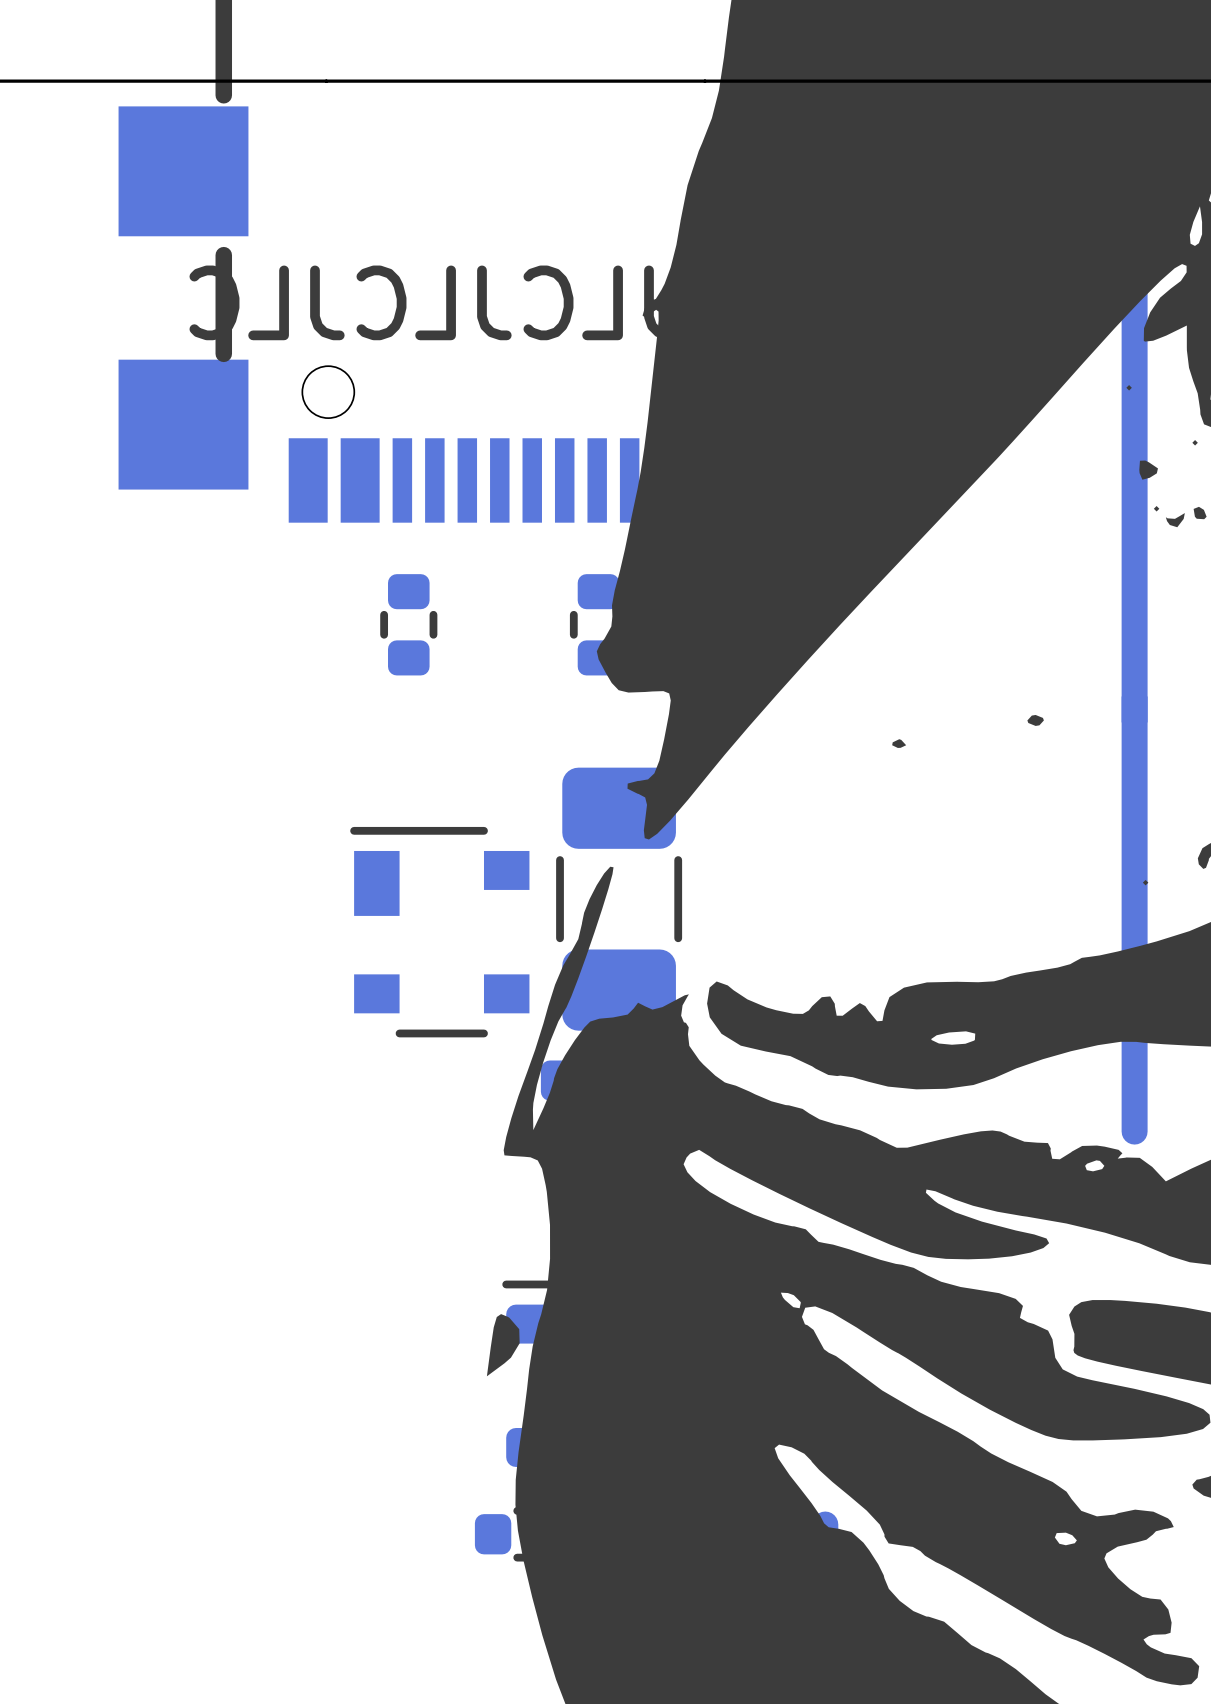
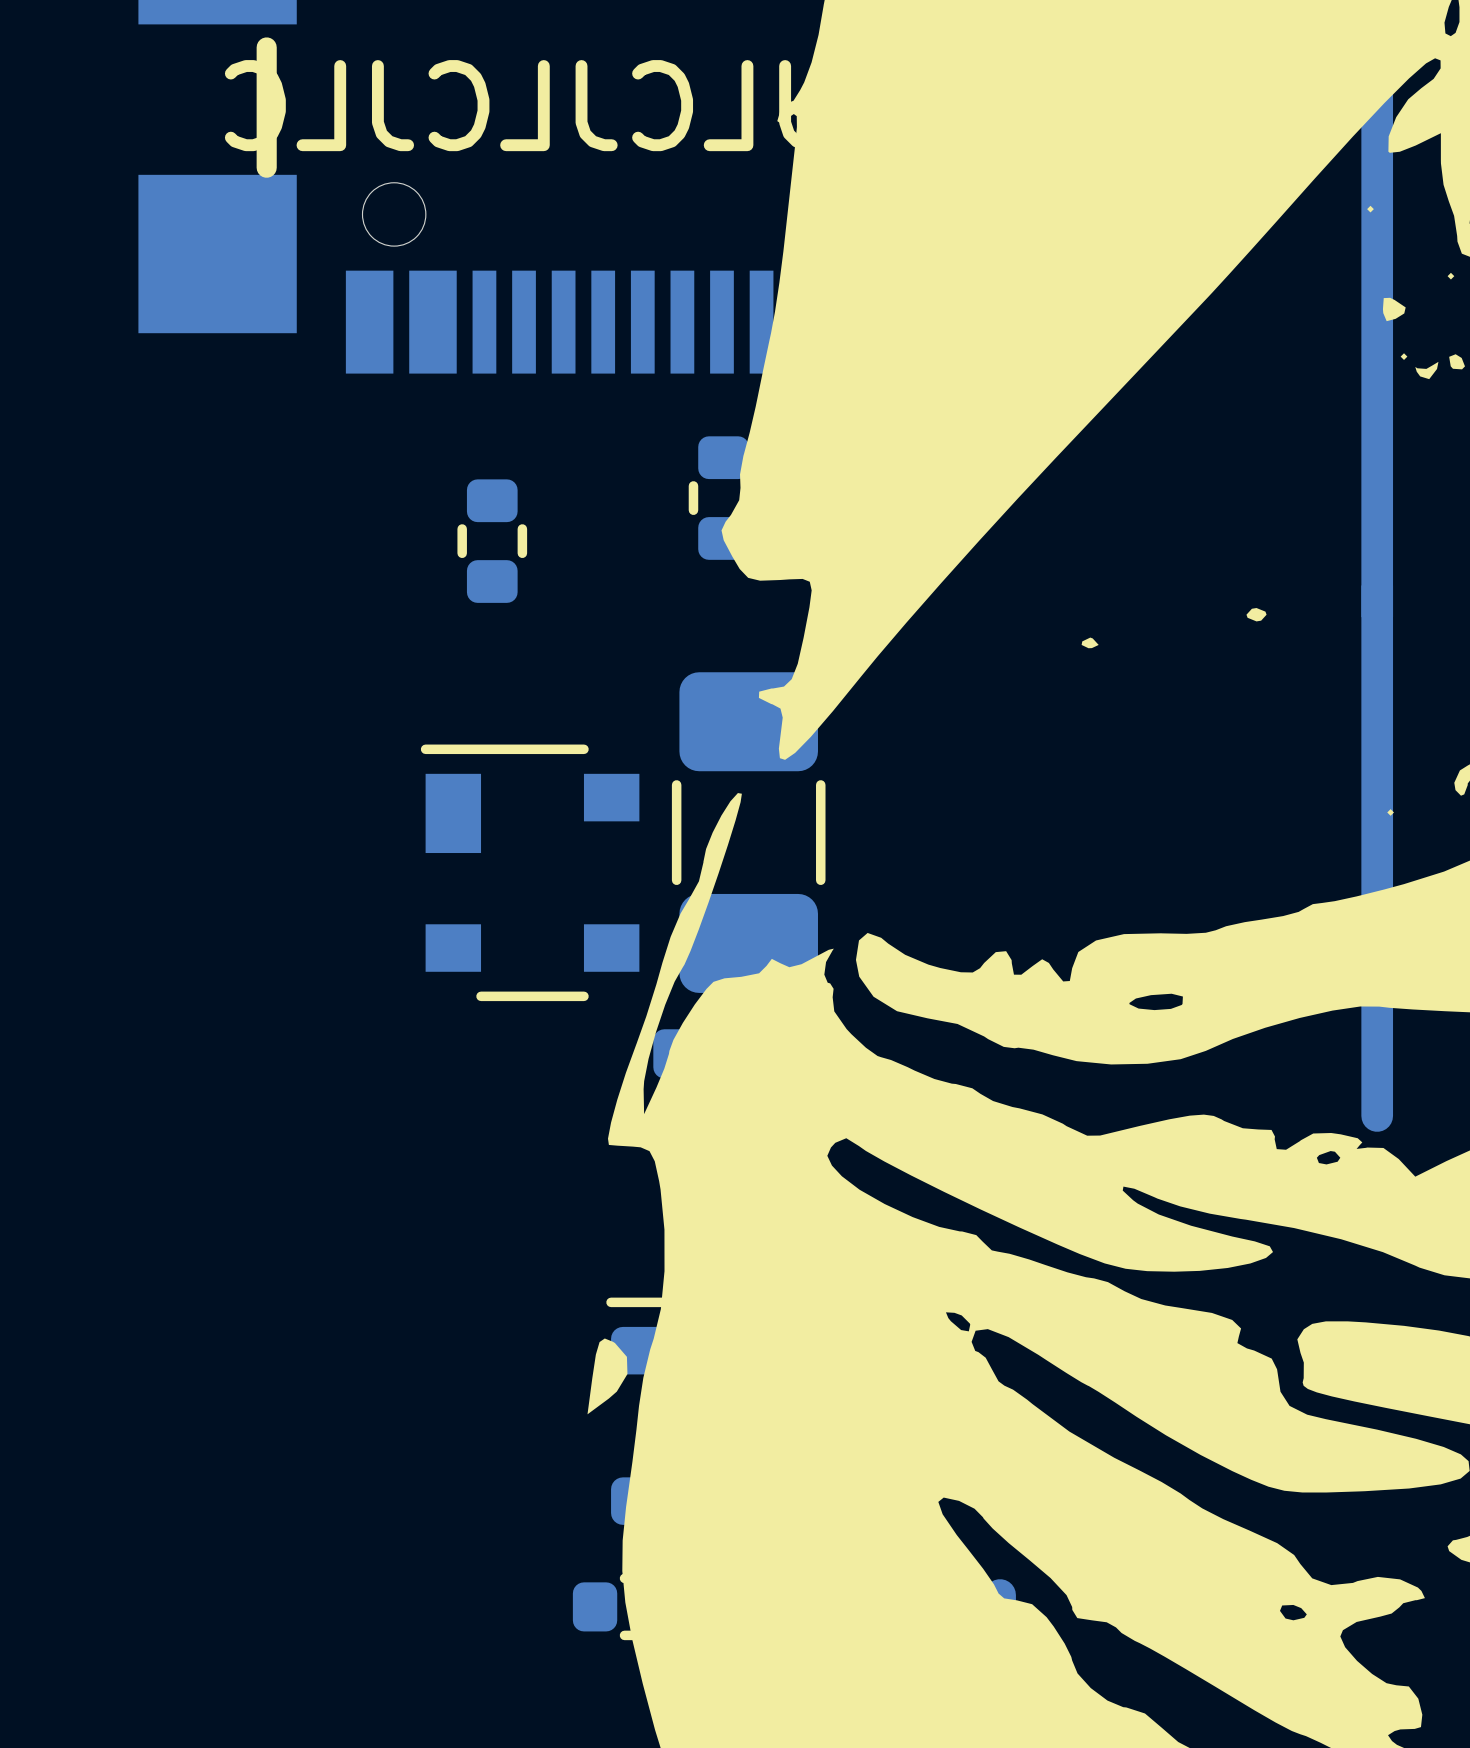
part position: (408, 624) -> (492, 541)

